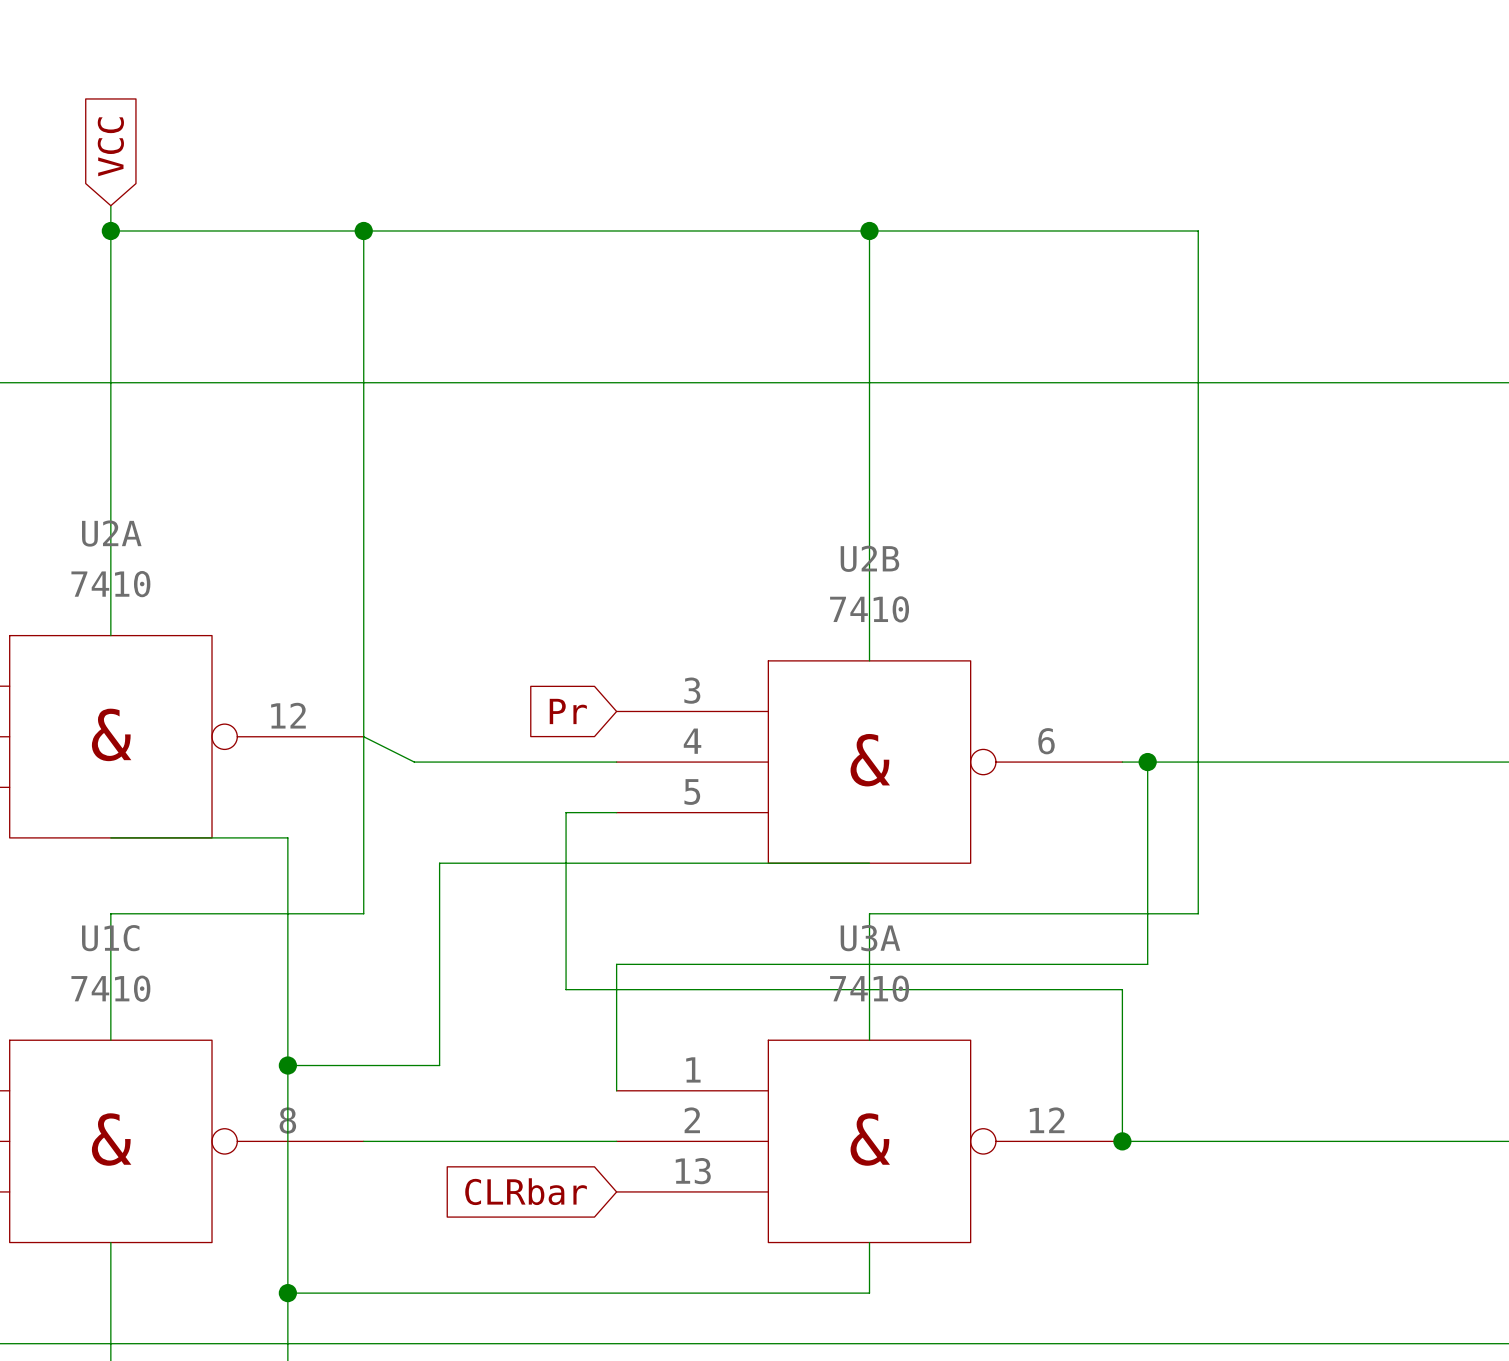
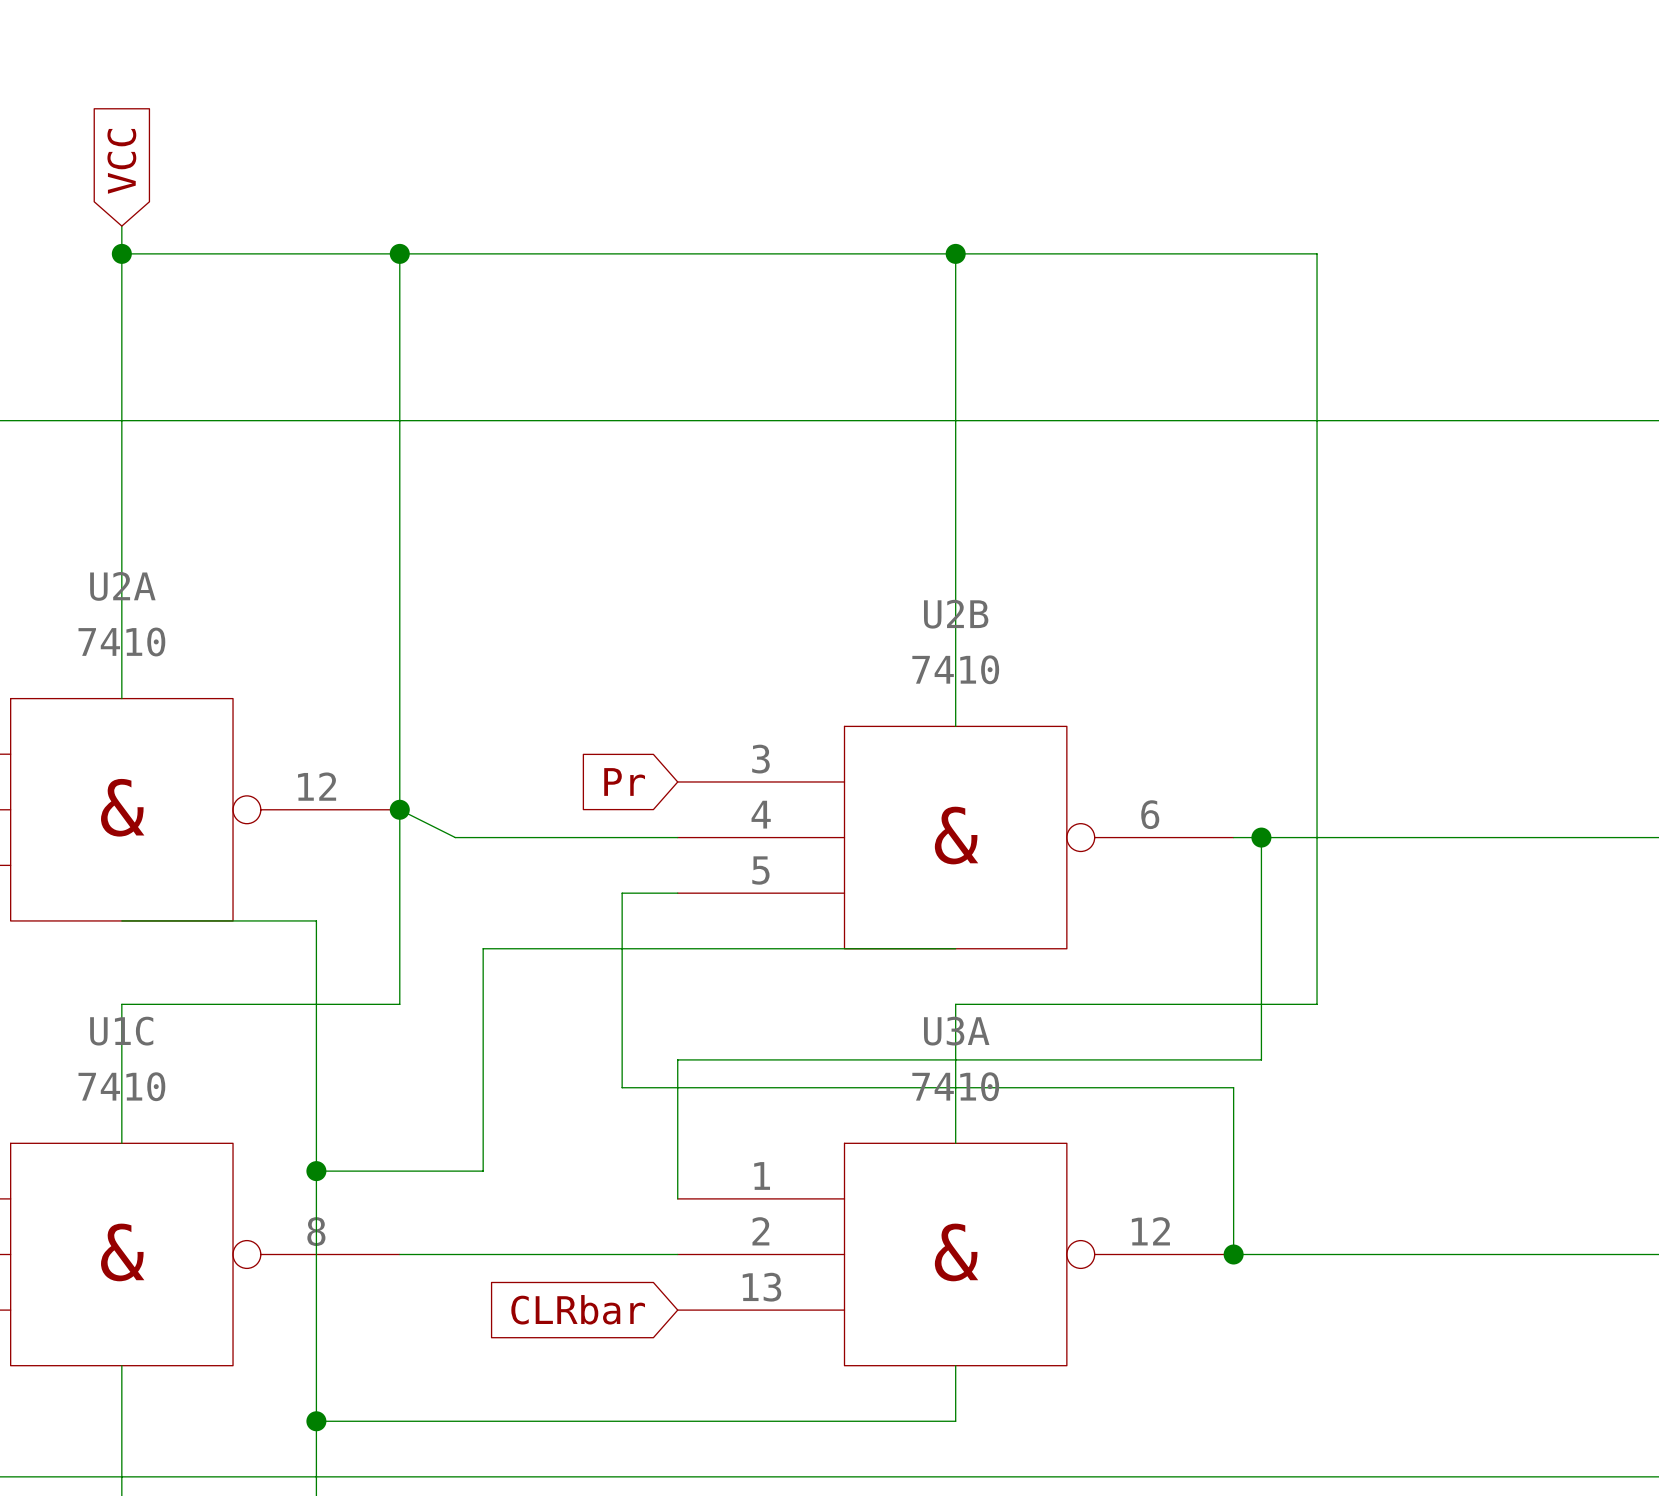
junction: none -> (399, 809)

